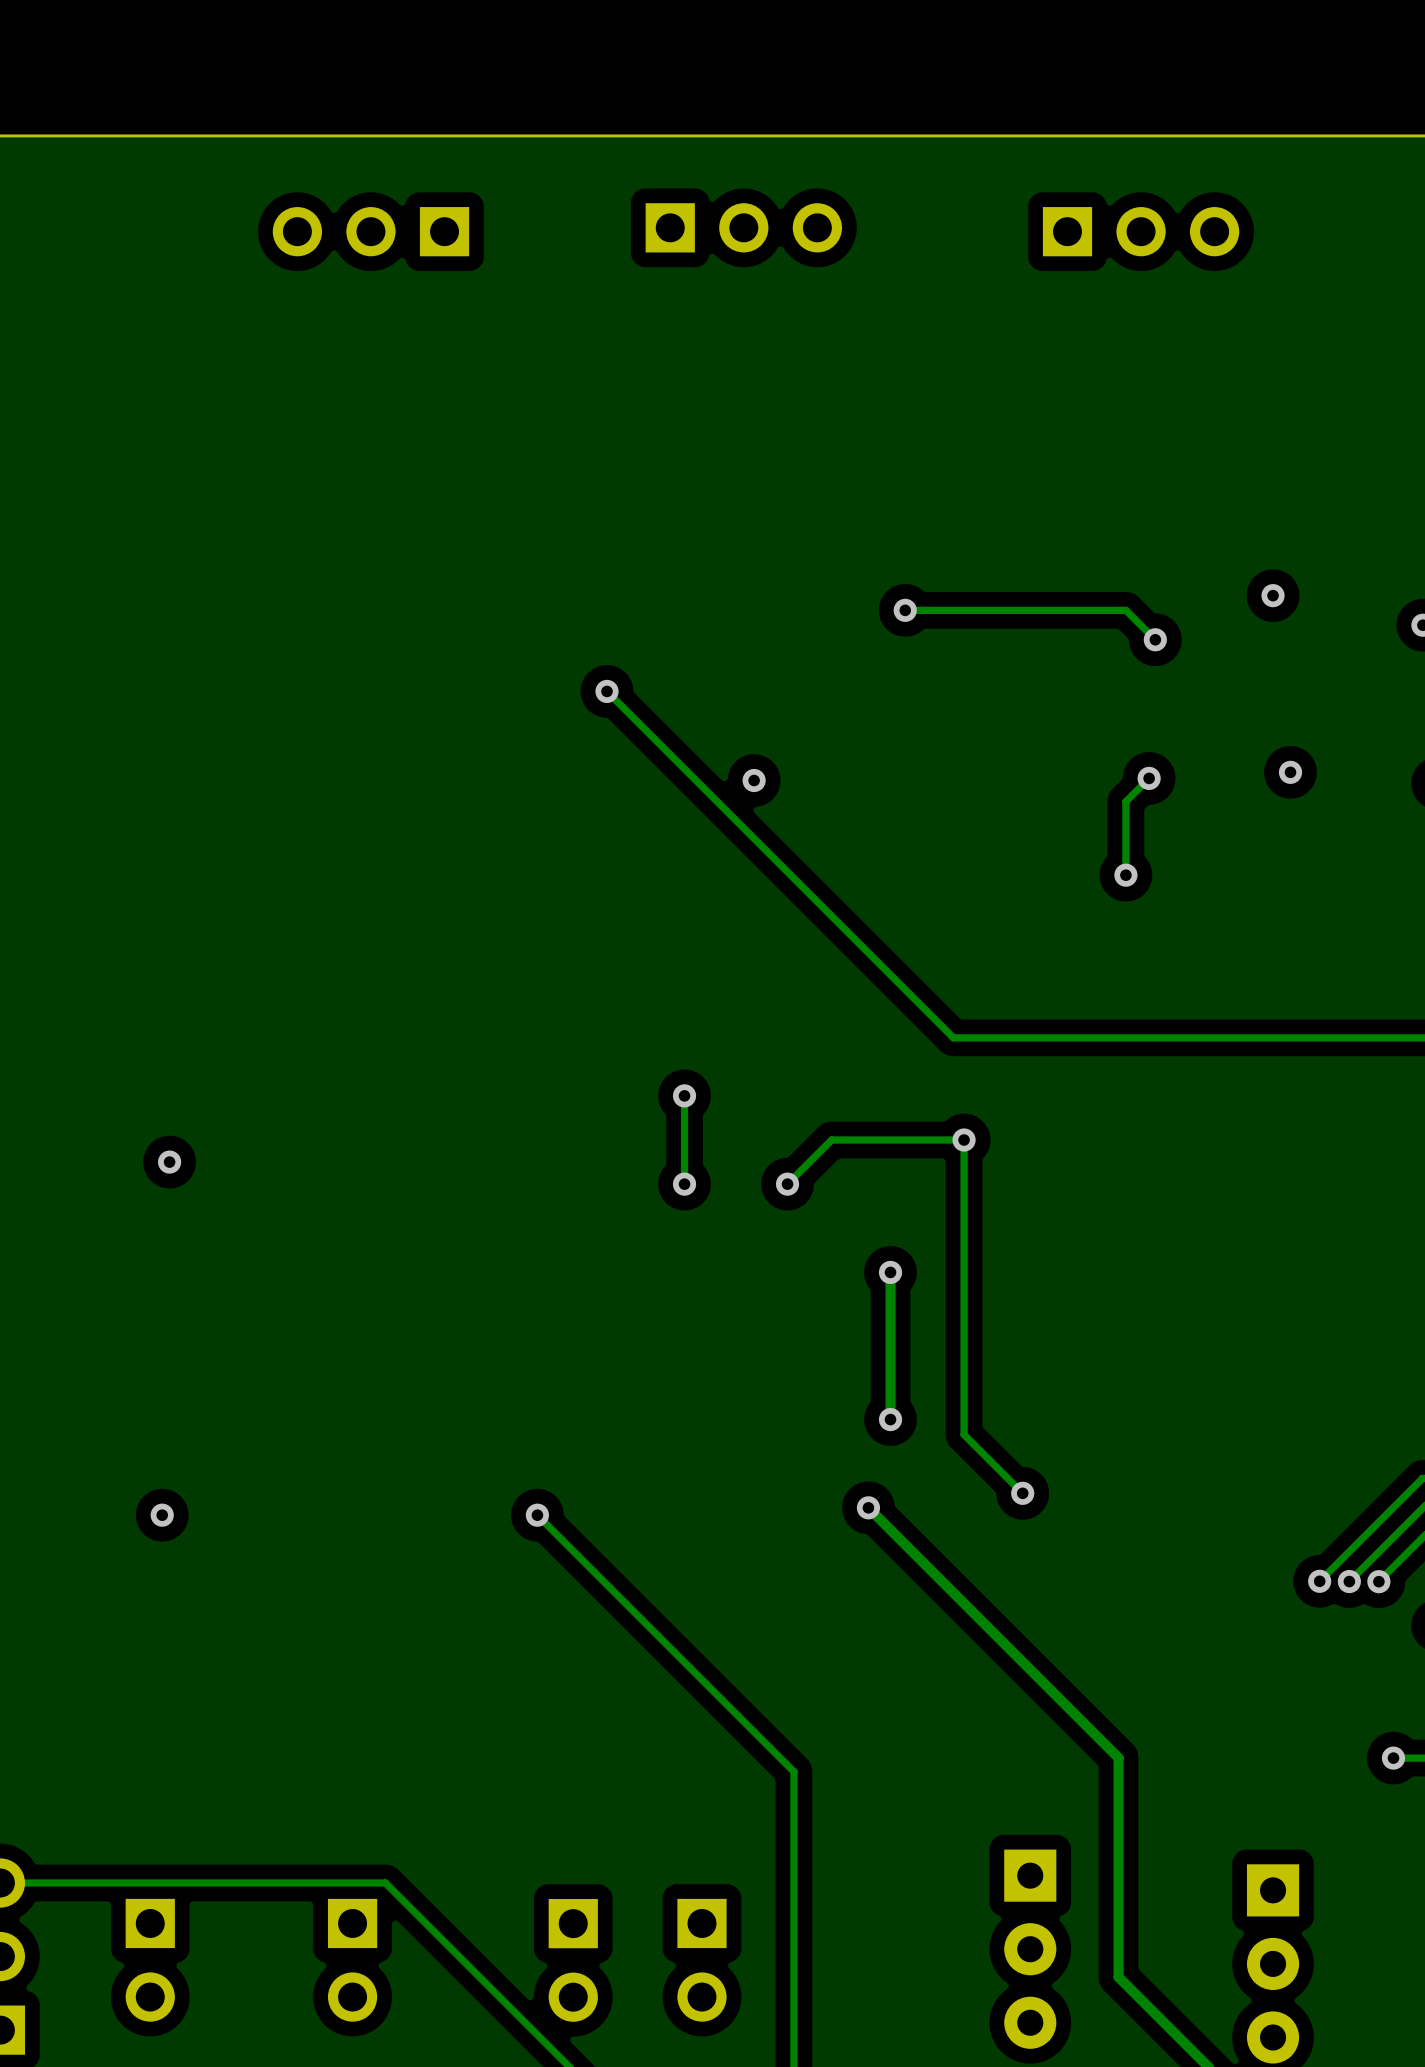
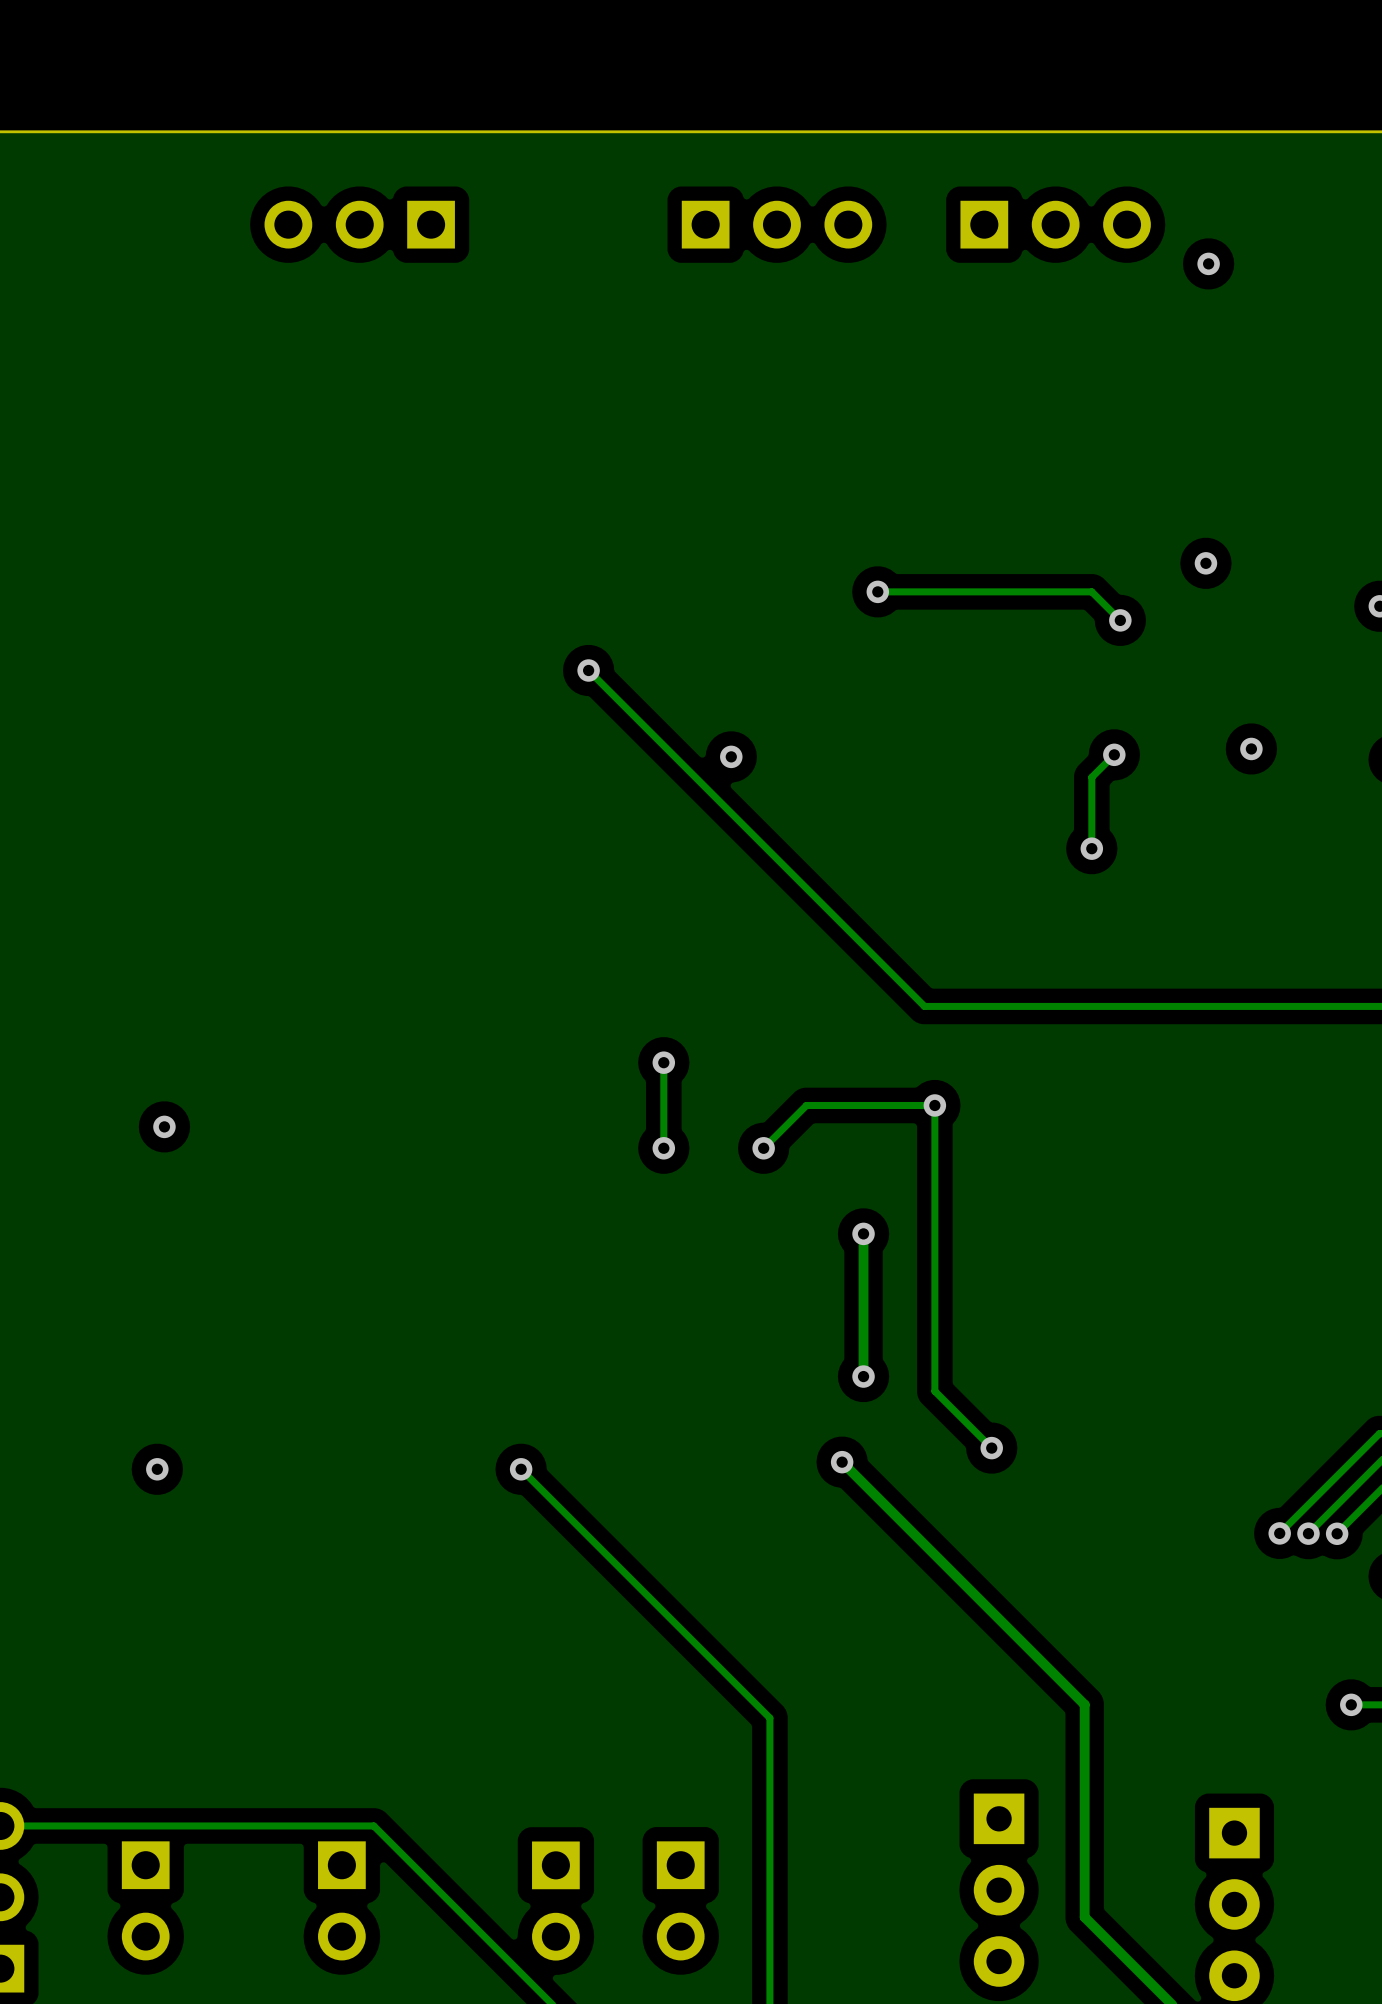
part position: (743, 227) -> (776, 224)
part position: (1141, 231) -> (1055, 224)
via: none -> (1208, 263)
via position: (1273, 595) -> (1205, 563)

